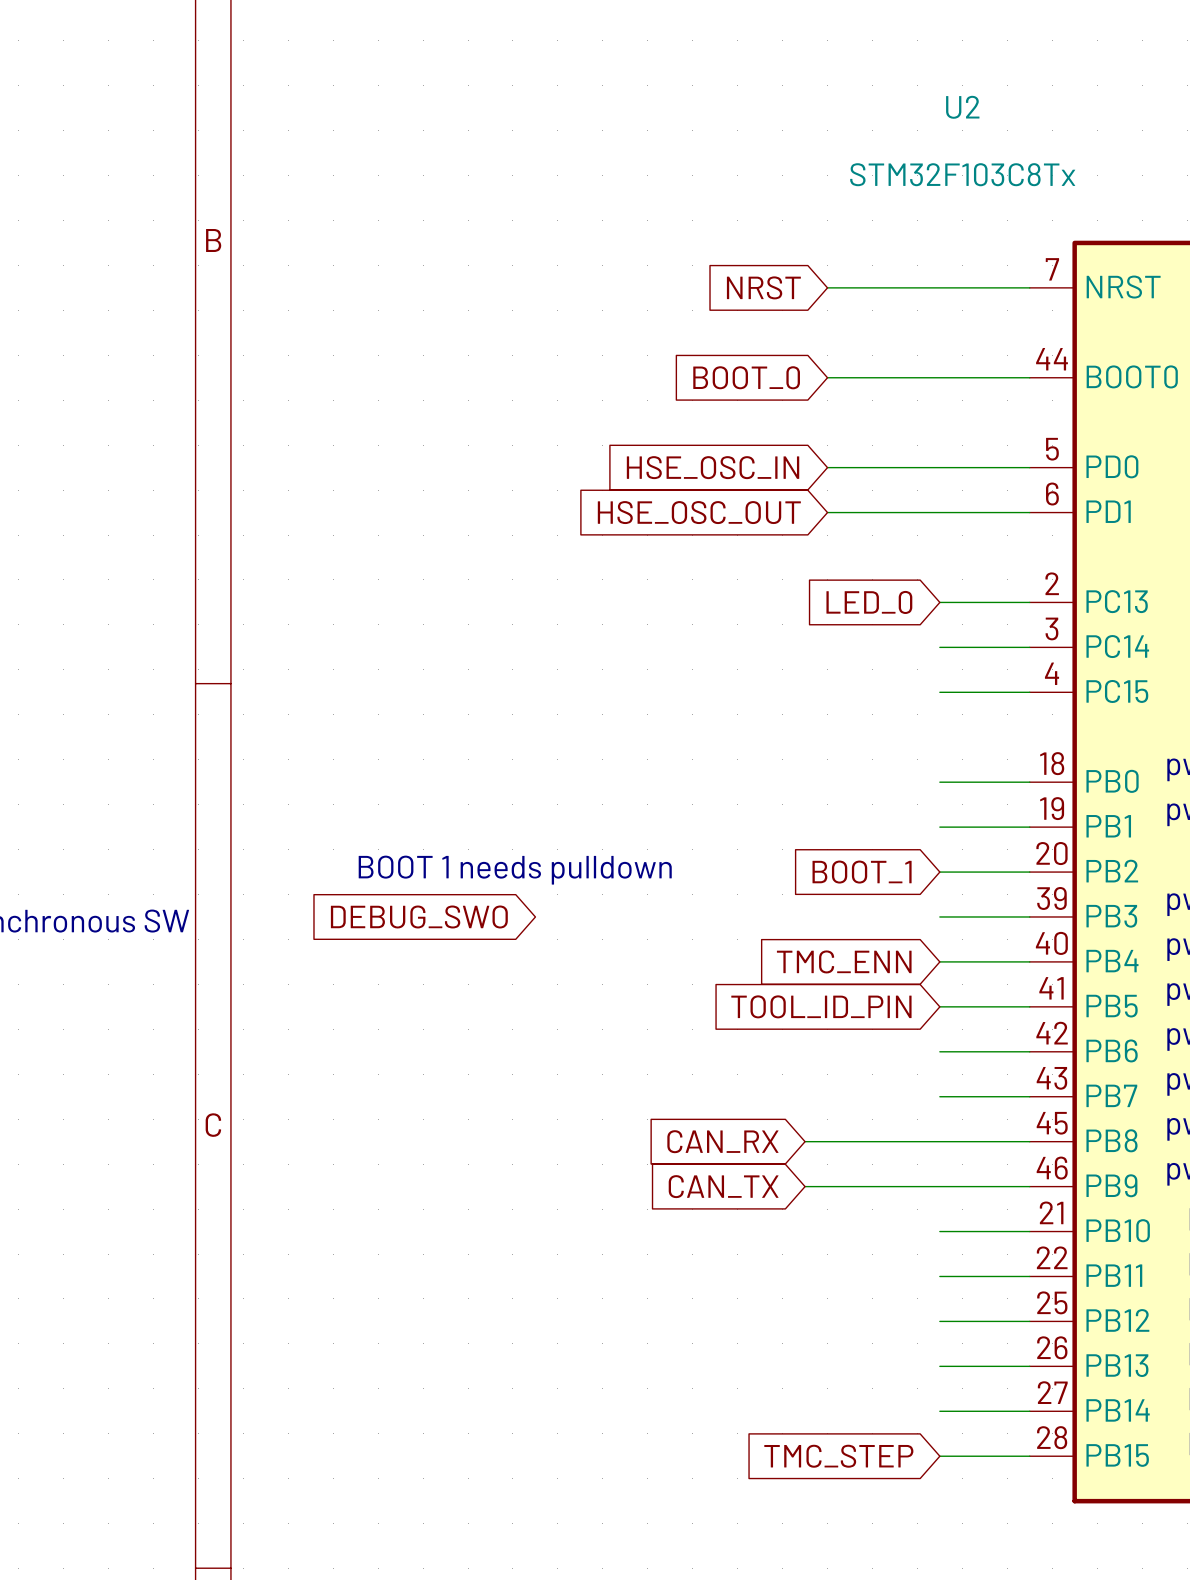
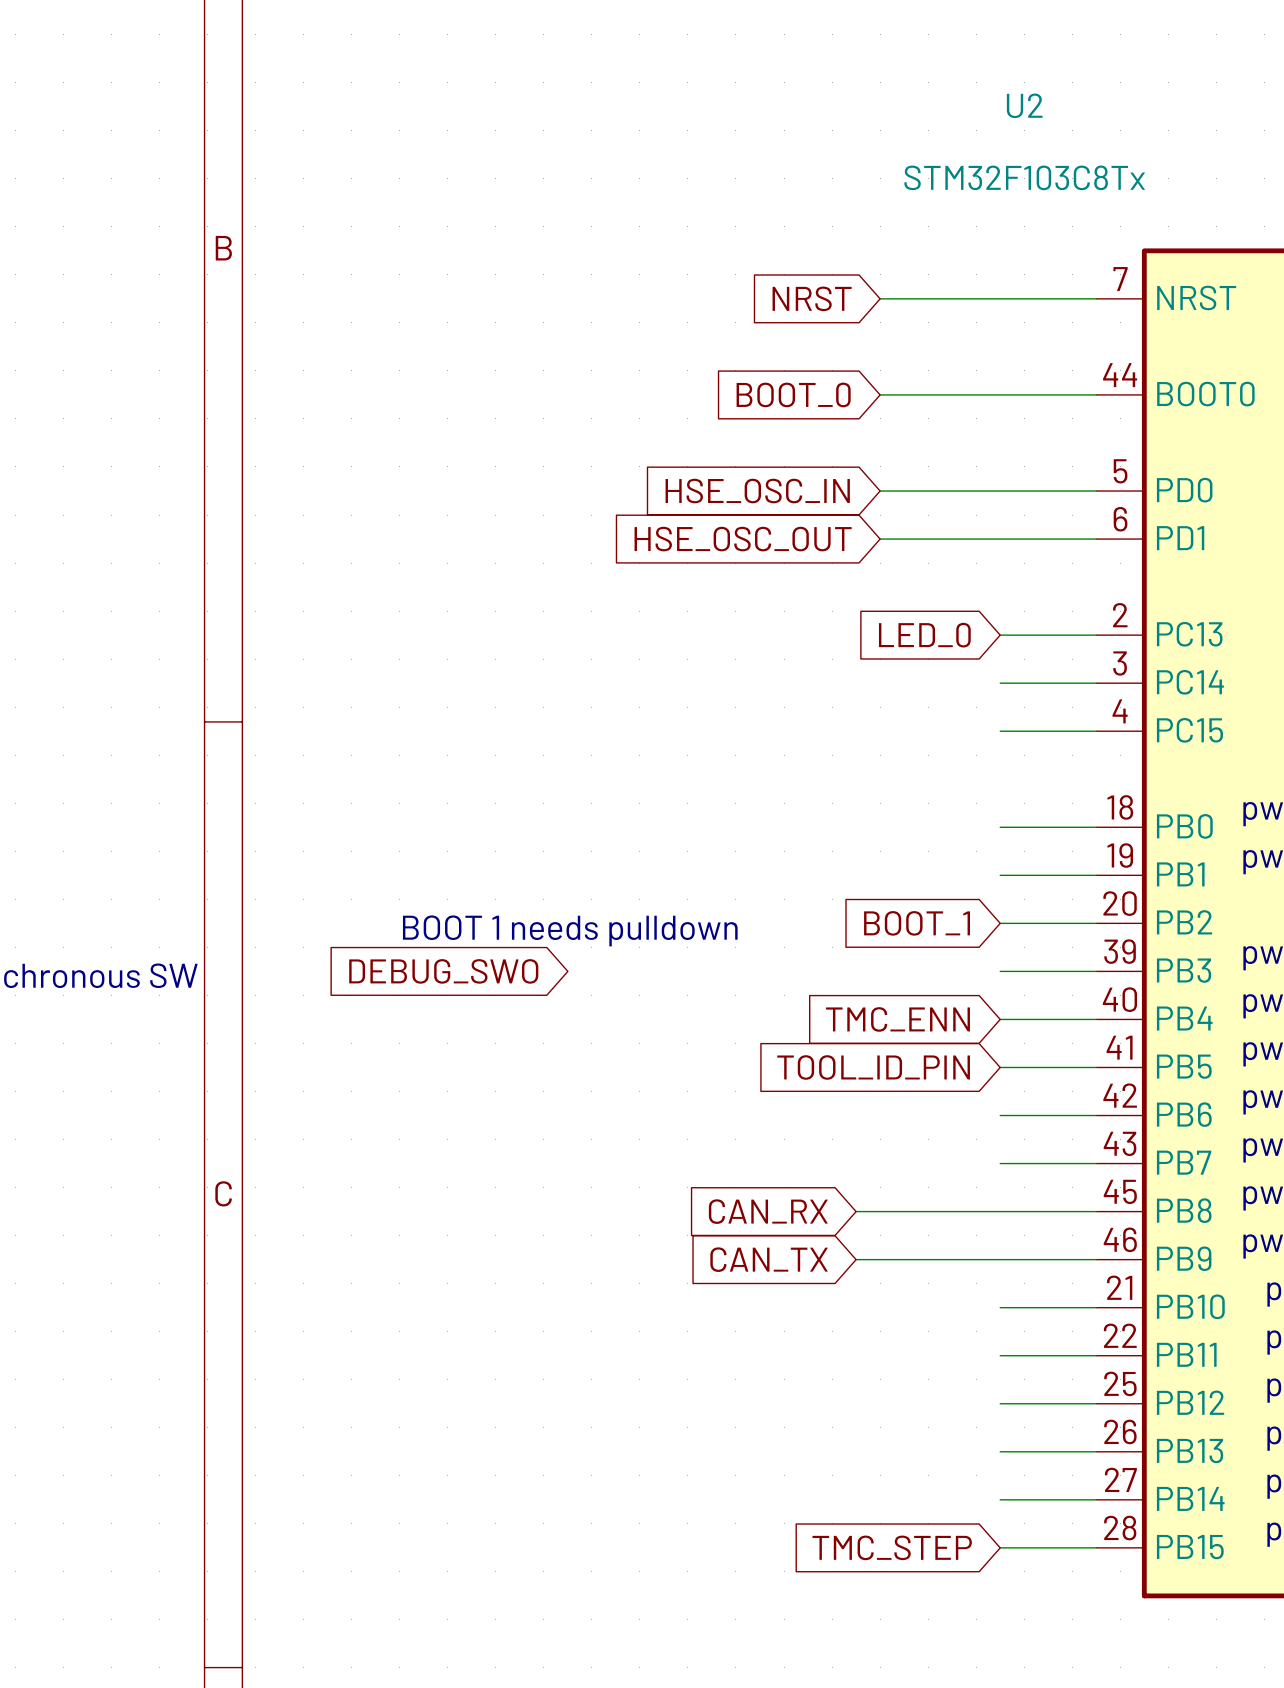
text position: BOOT 1 needs pulldown (515, 870) -> BOOT 1 needs pulldown (570, 930)

